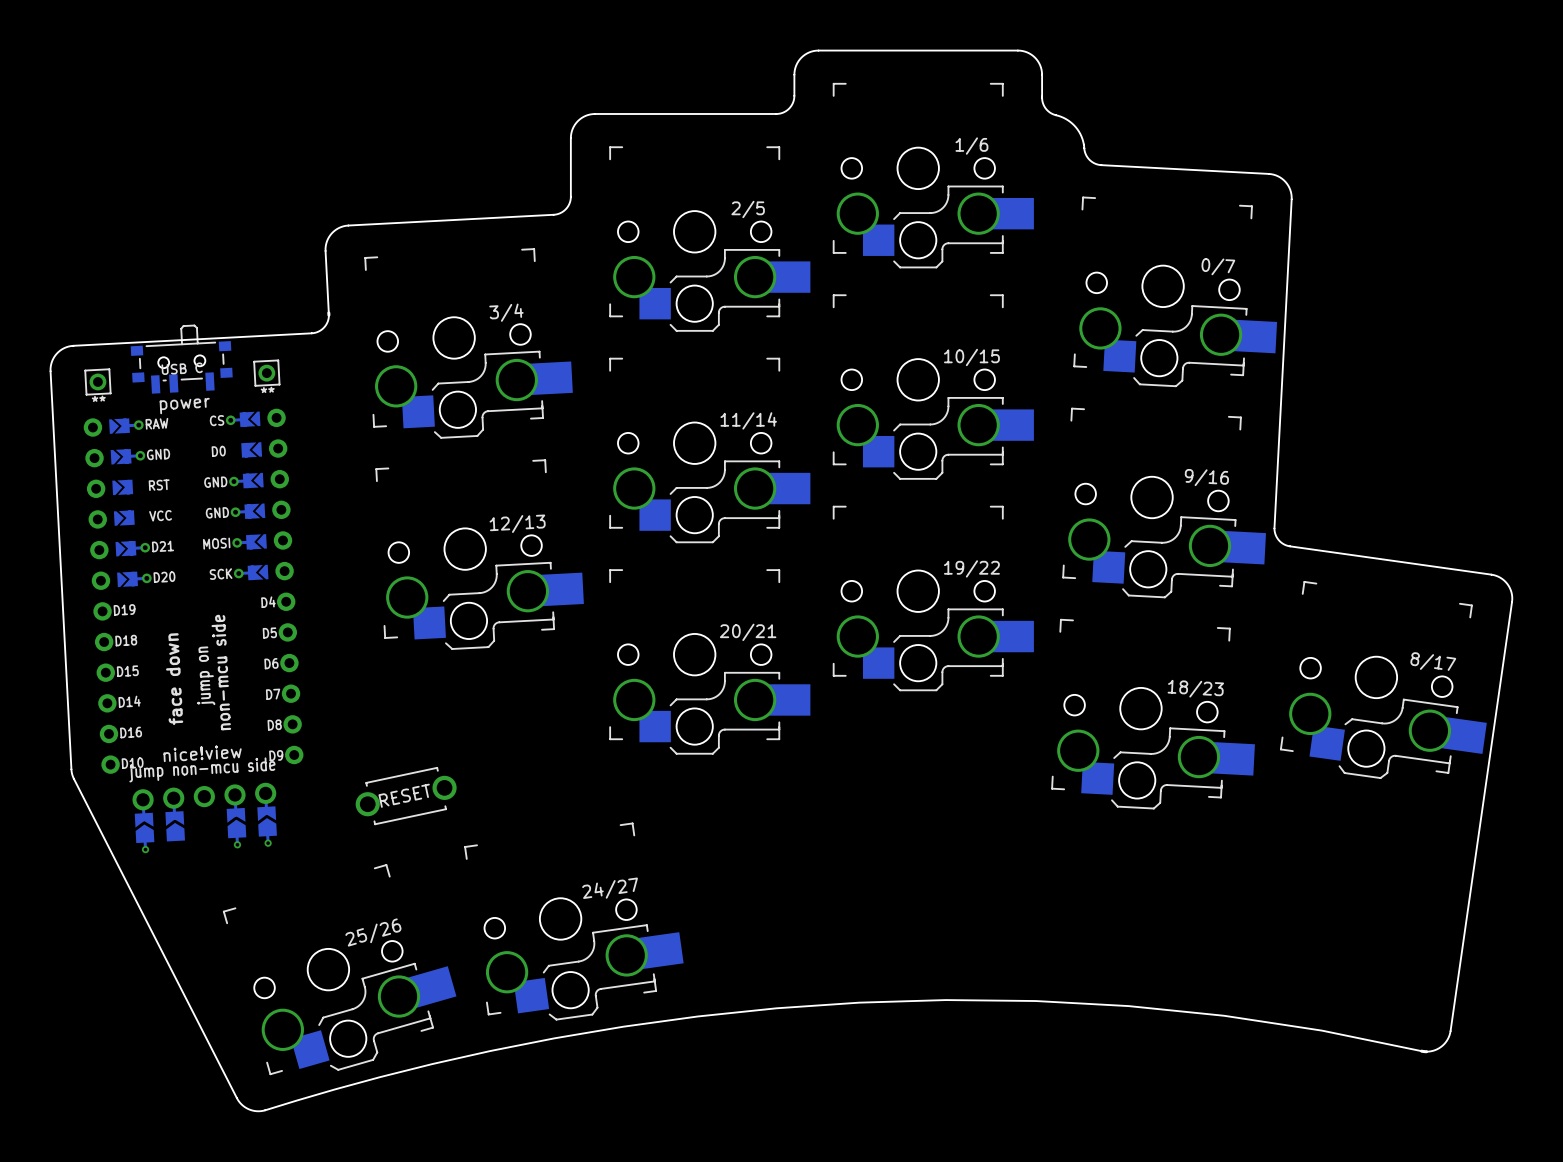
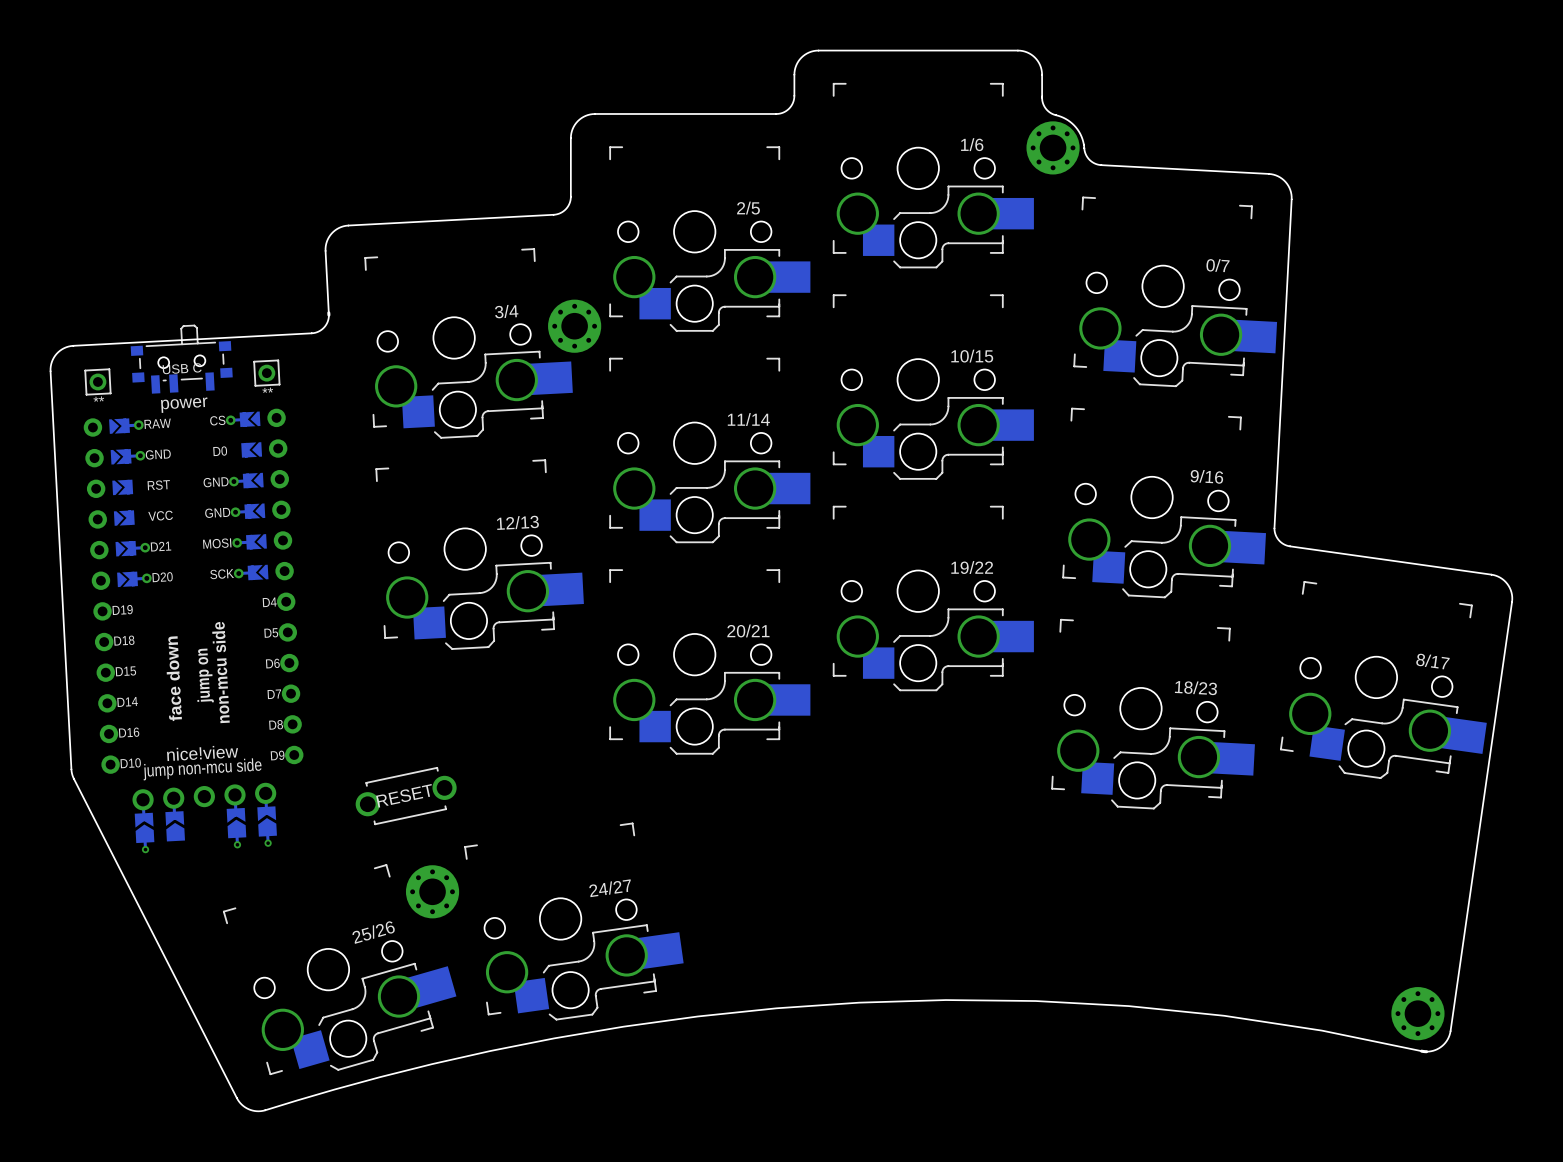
part: none -> (1053, 147)
part: none -> (574, 326)
part: none -> (432, 891)
part: none -> (1417, 1013)

